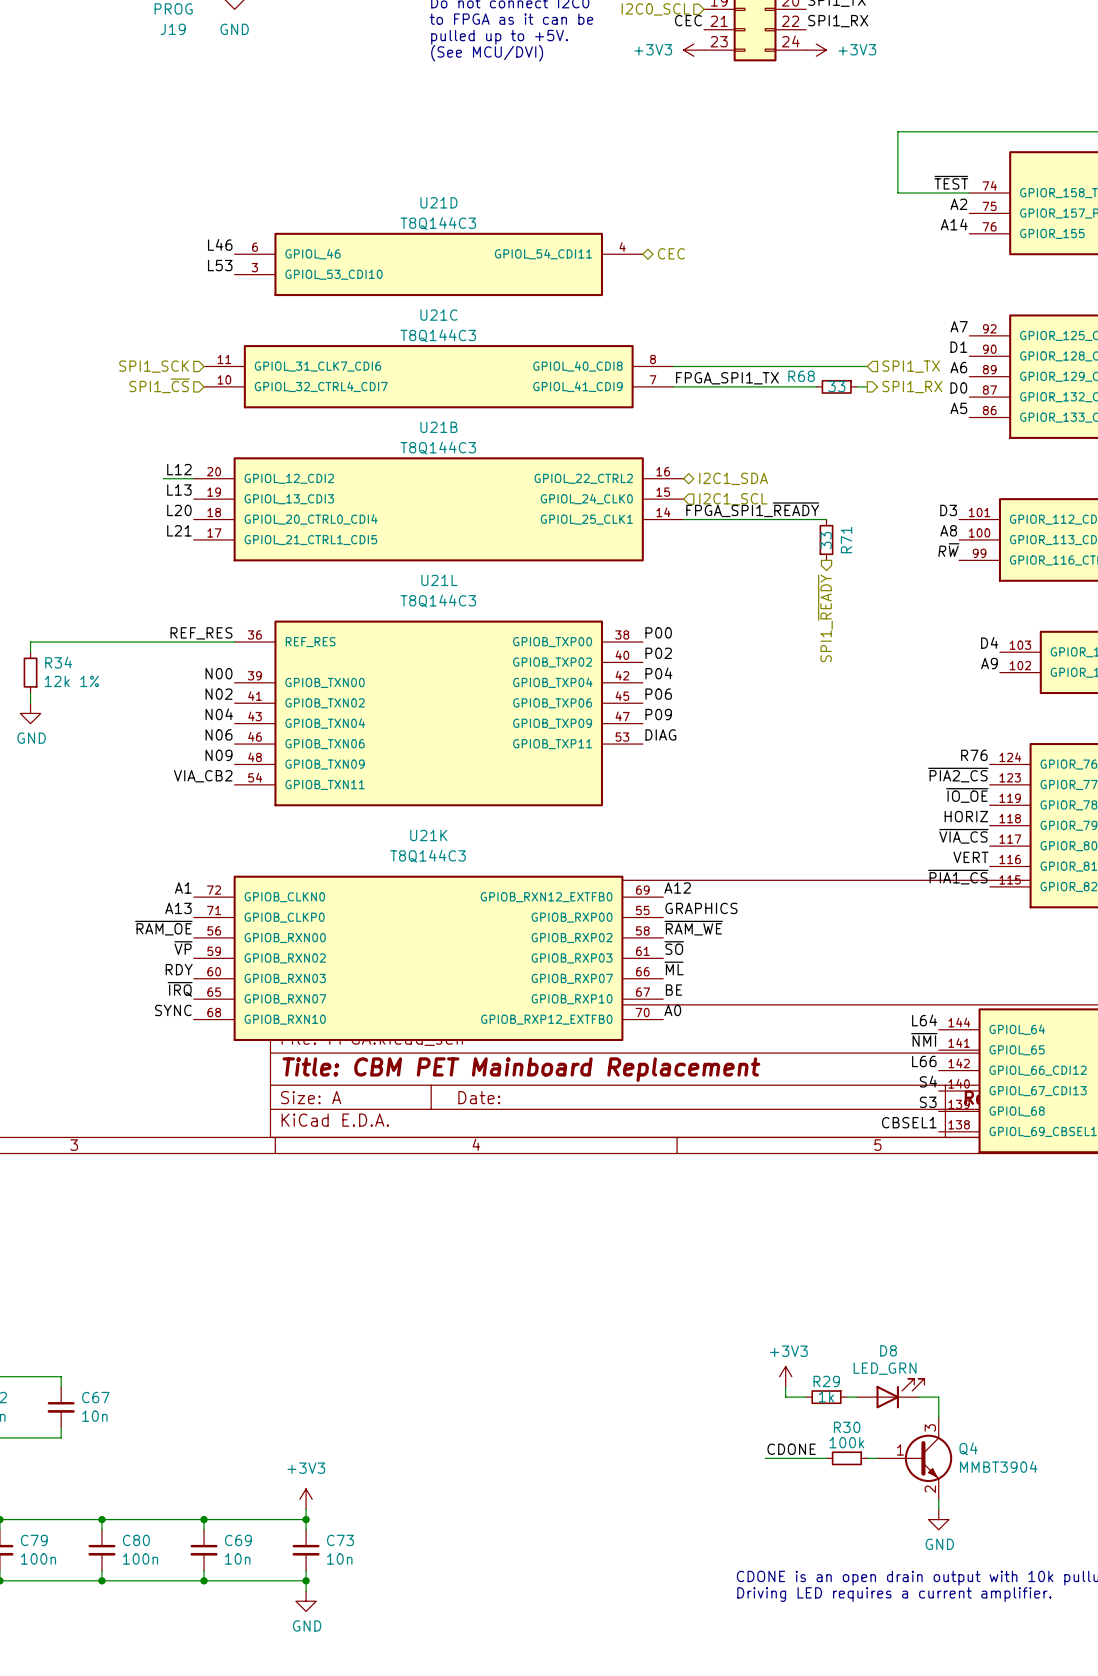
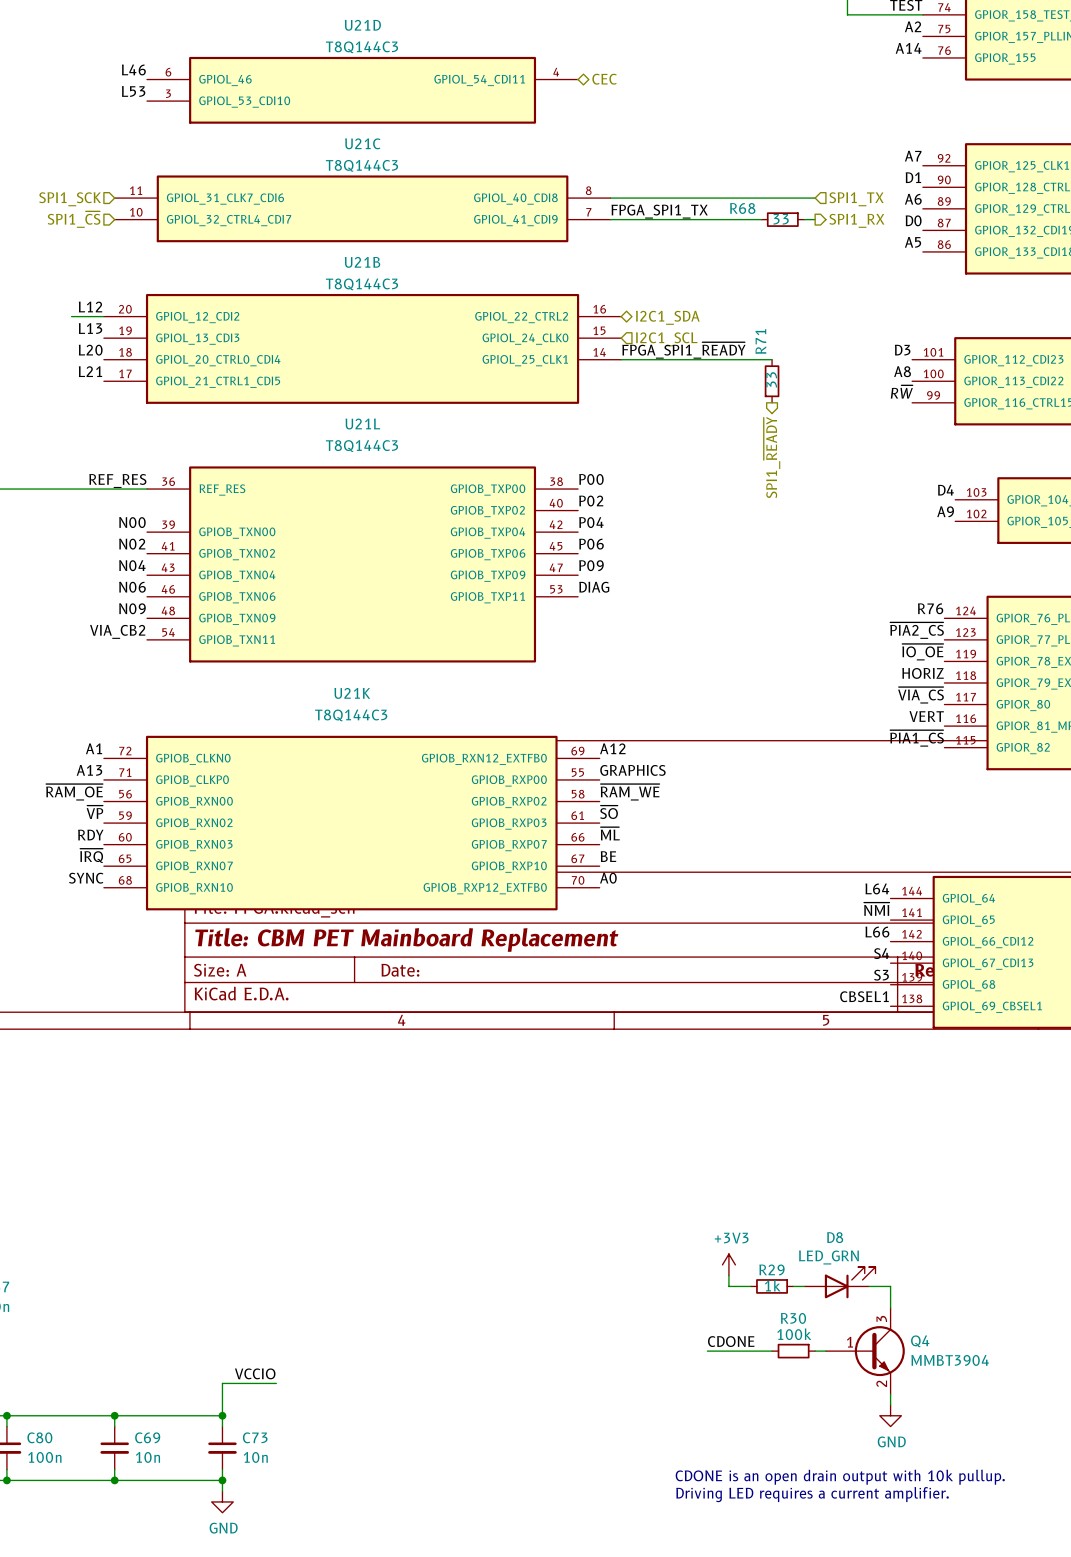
R71 name position: R71 (846, 540) -> R71 (760, 341)
label: none -> VCCIO (255, 1373)
wire: none -> (276, 1383) (222, 1383) (222, 1404)
power symbol: +3V3 (306, 1499) -> none

